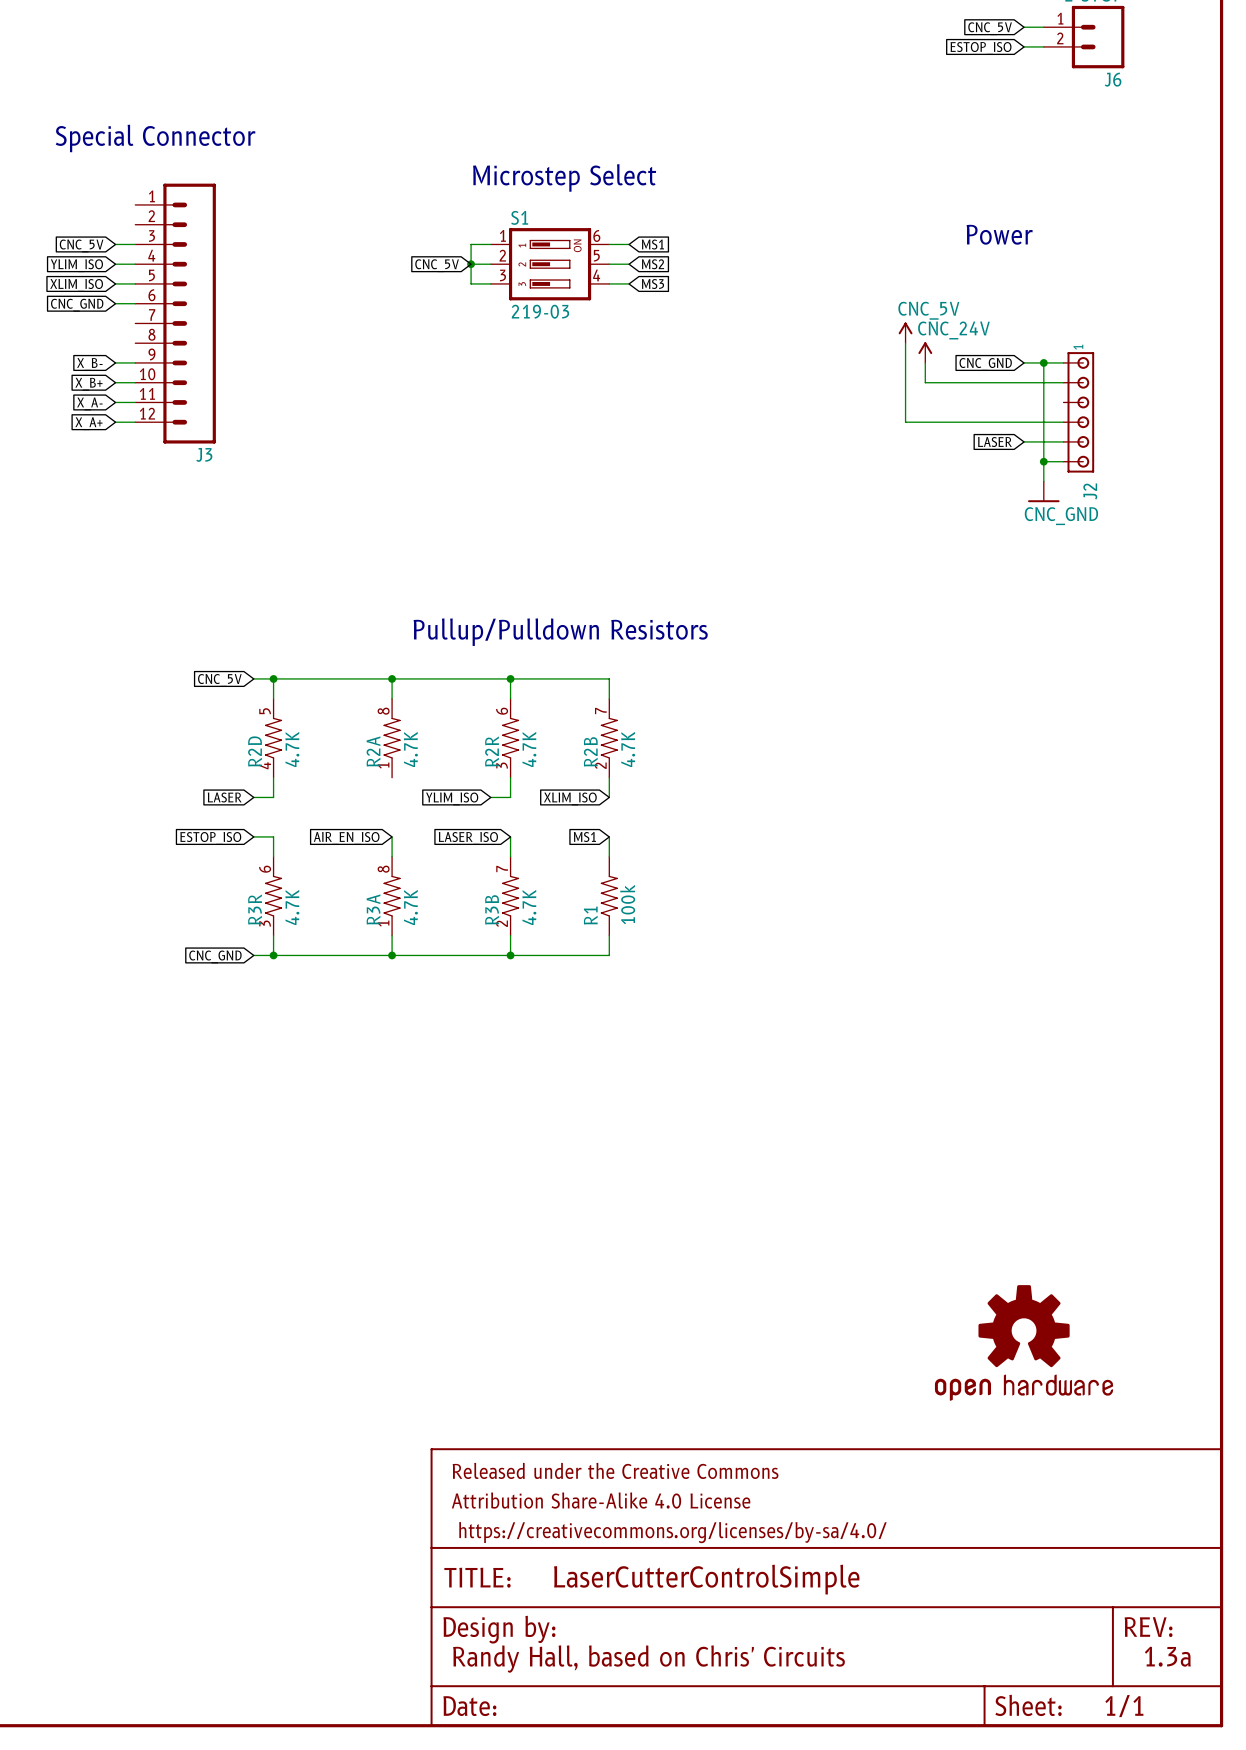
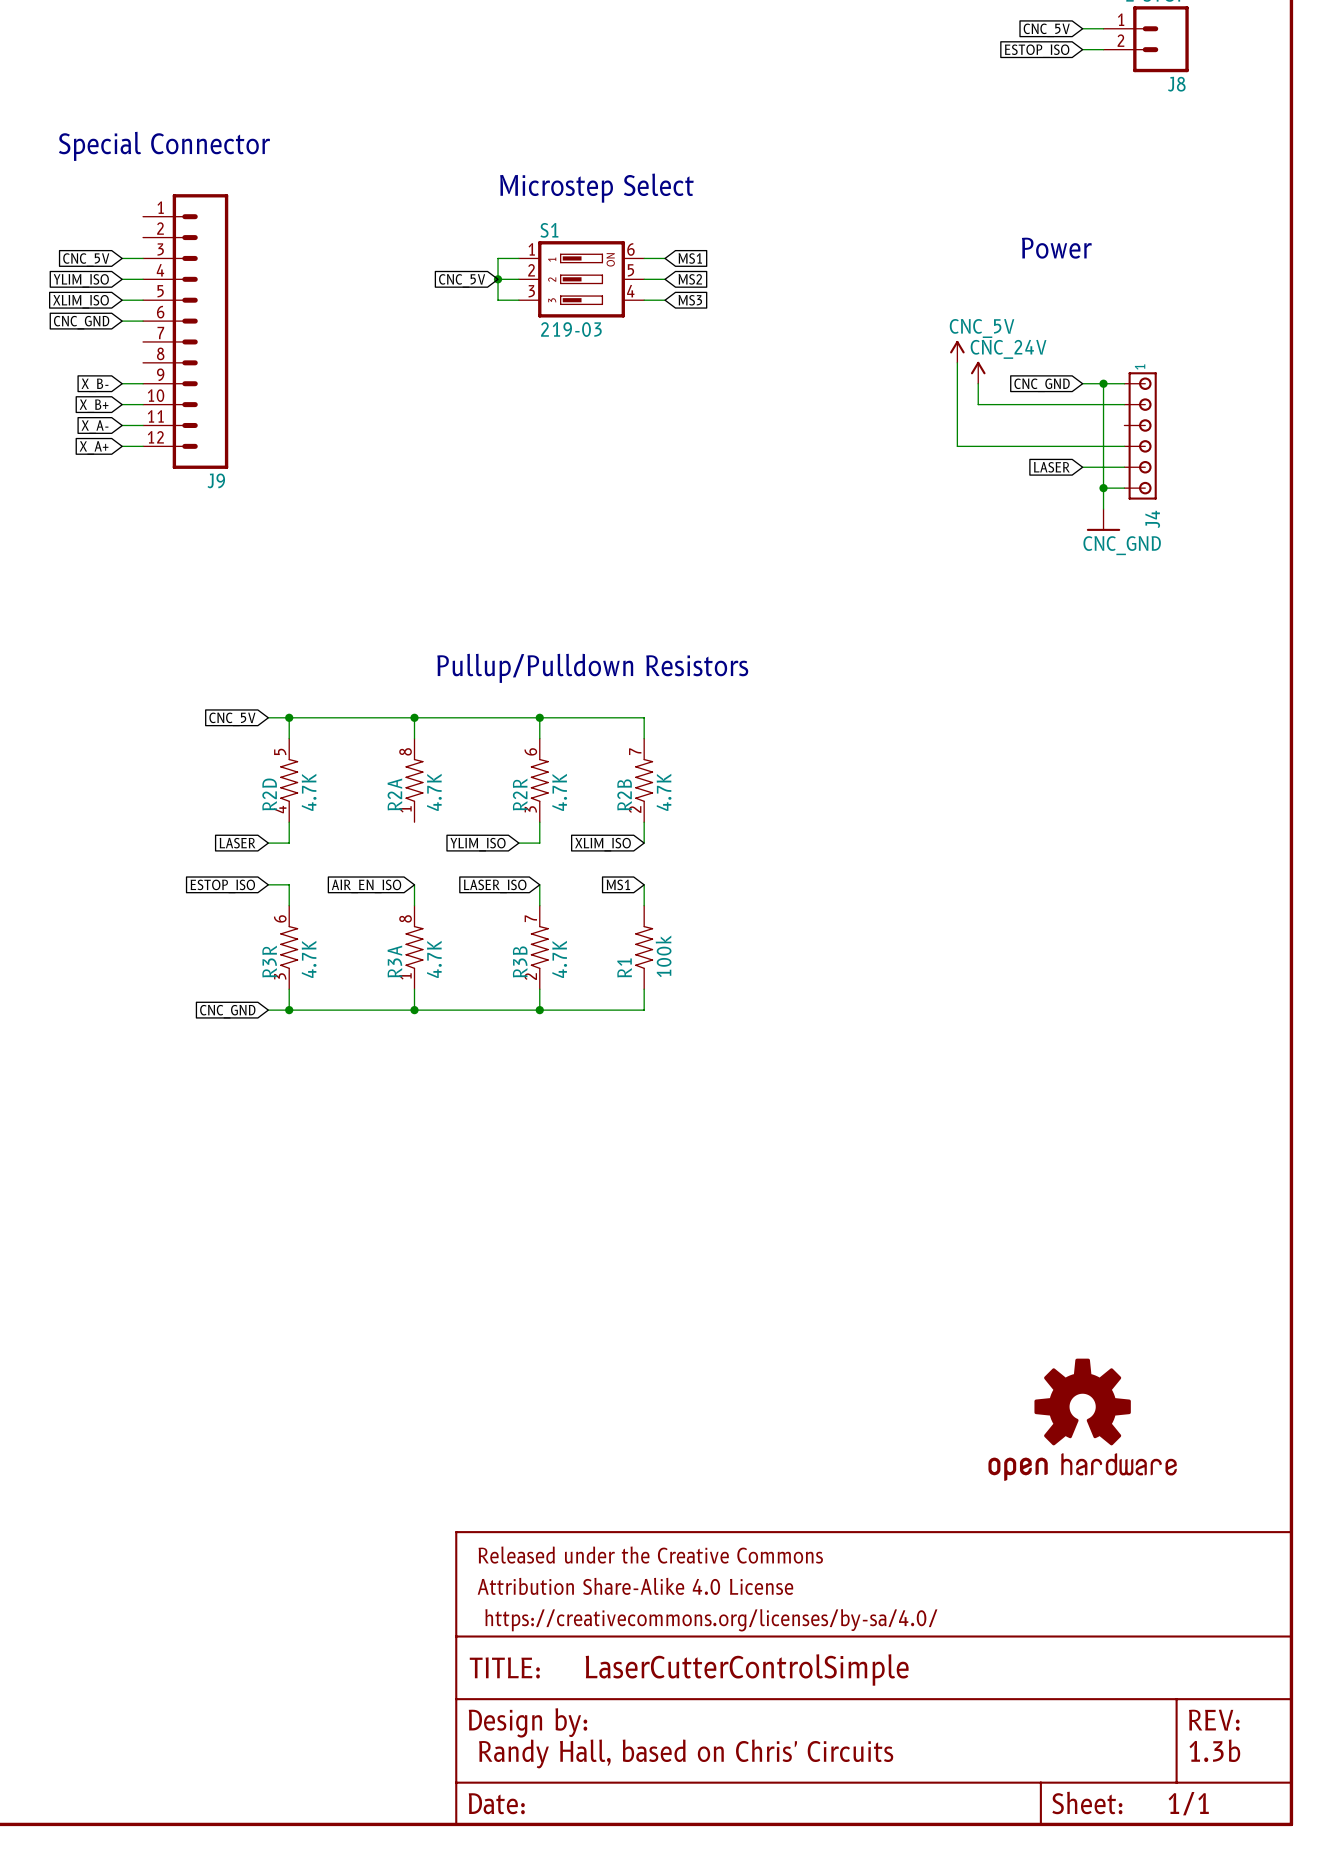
J6 name: J6 (1113, 79) -> J8 (1176, 84)
J3 name: J3 (204, 454) -> J9 (216, 480)
J2 name: J2 (1090, 491) -> J4 (1152, 519)
text: 1.3a (1167, 1656) -> 1.3b (1214, 1750)

